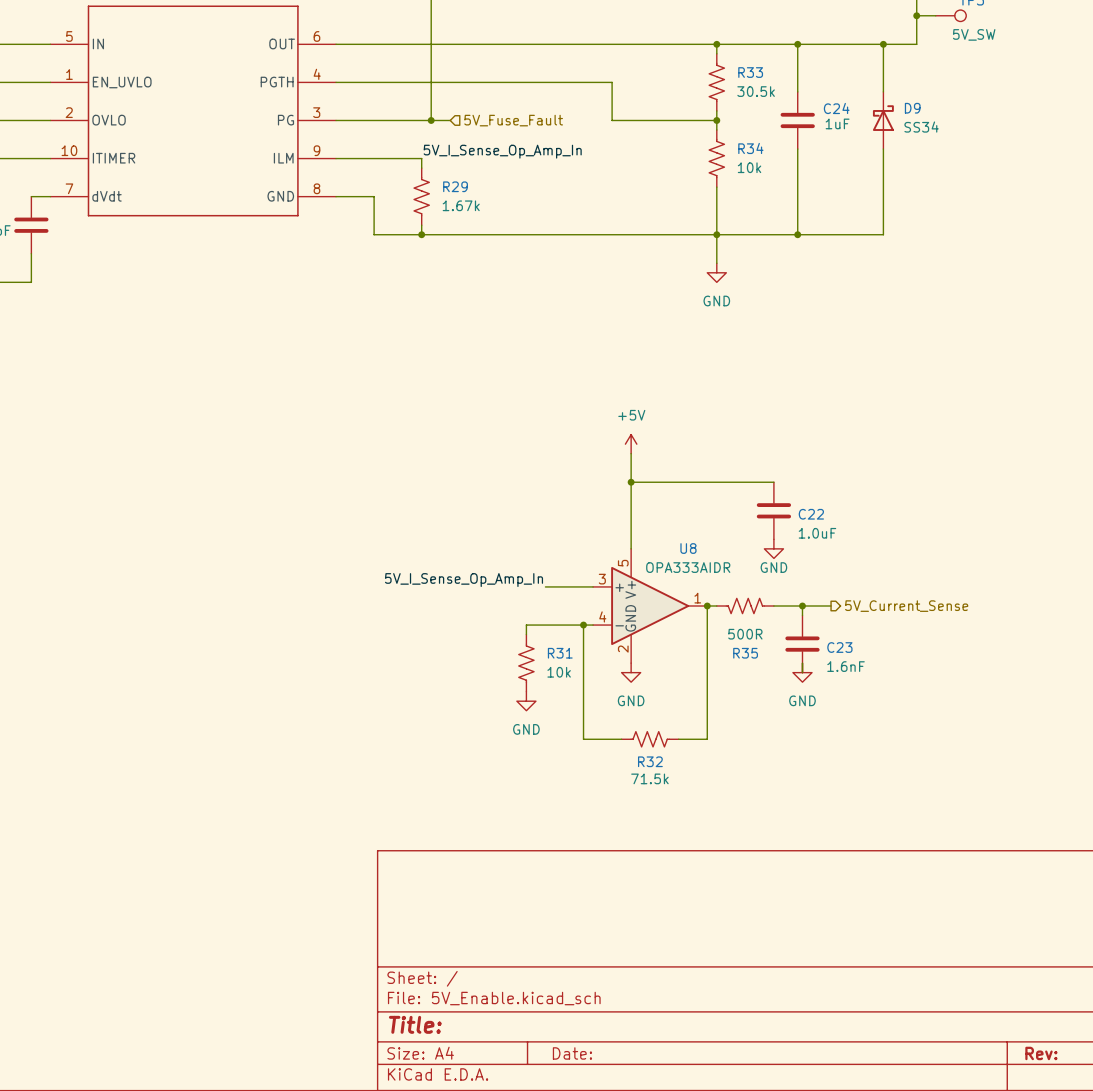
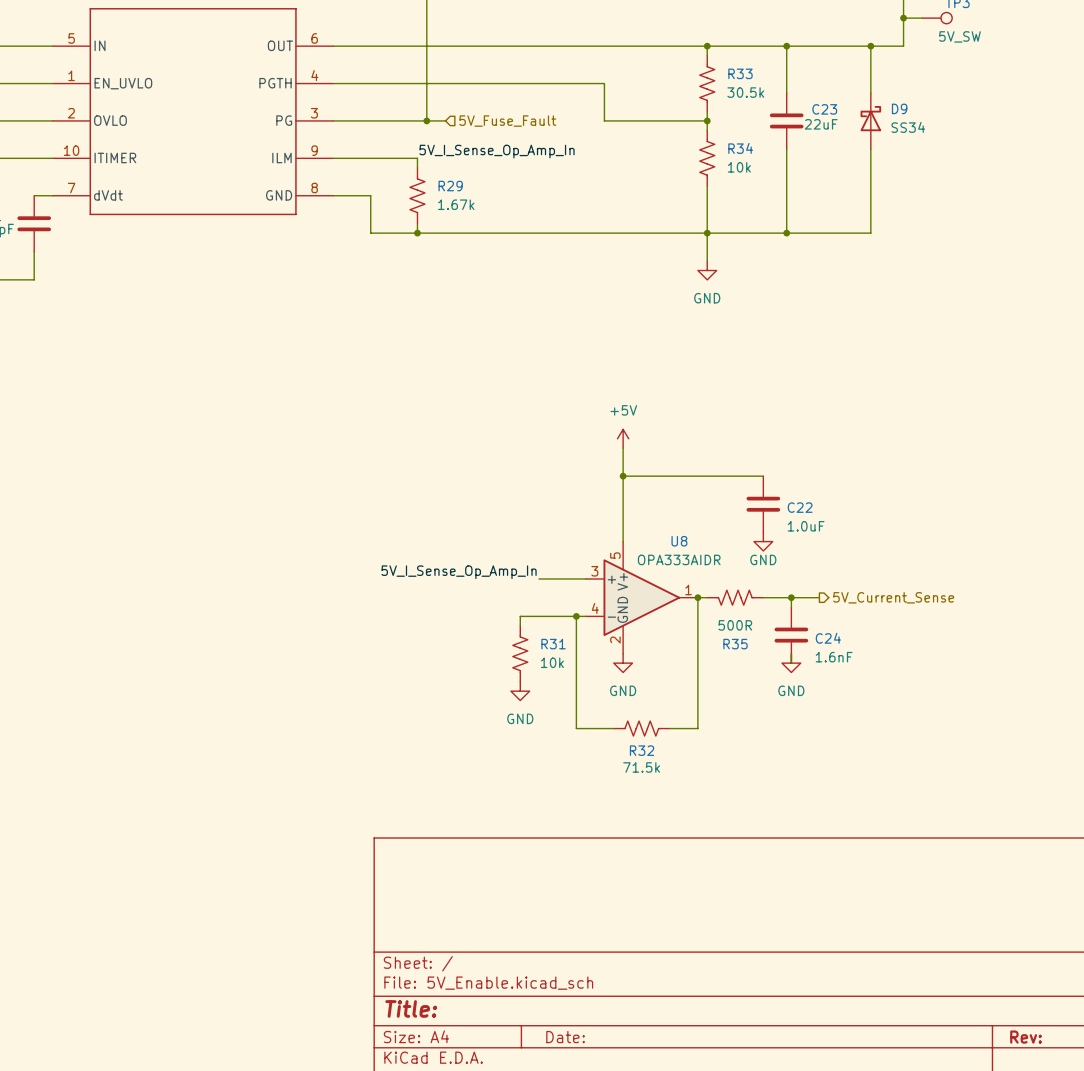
C24 name: C24 (836, 108) -> C23 (824, 109)
C24 value: 1uF (837, 123) -> 22uF (821, 124)
C23 name: C23 (839, 647) -> C24 (828, 638)

